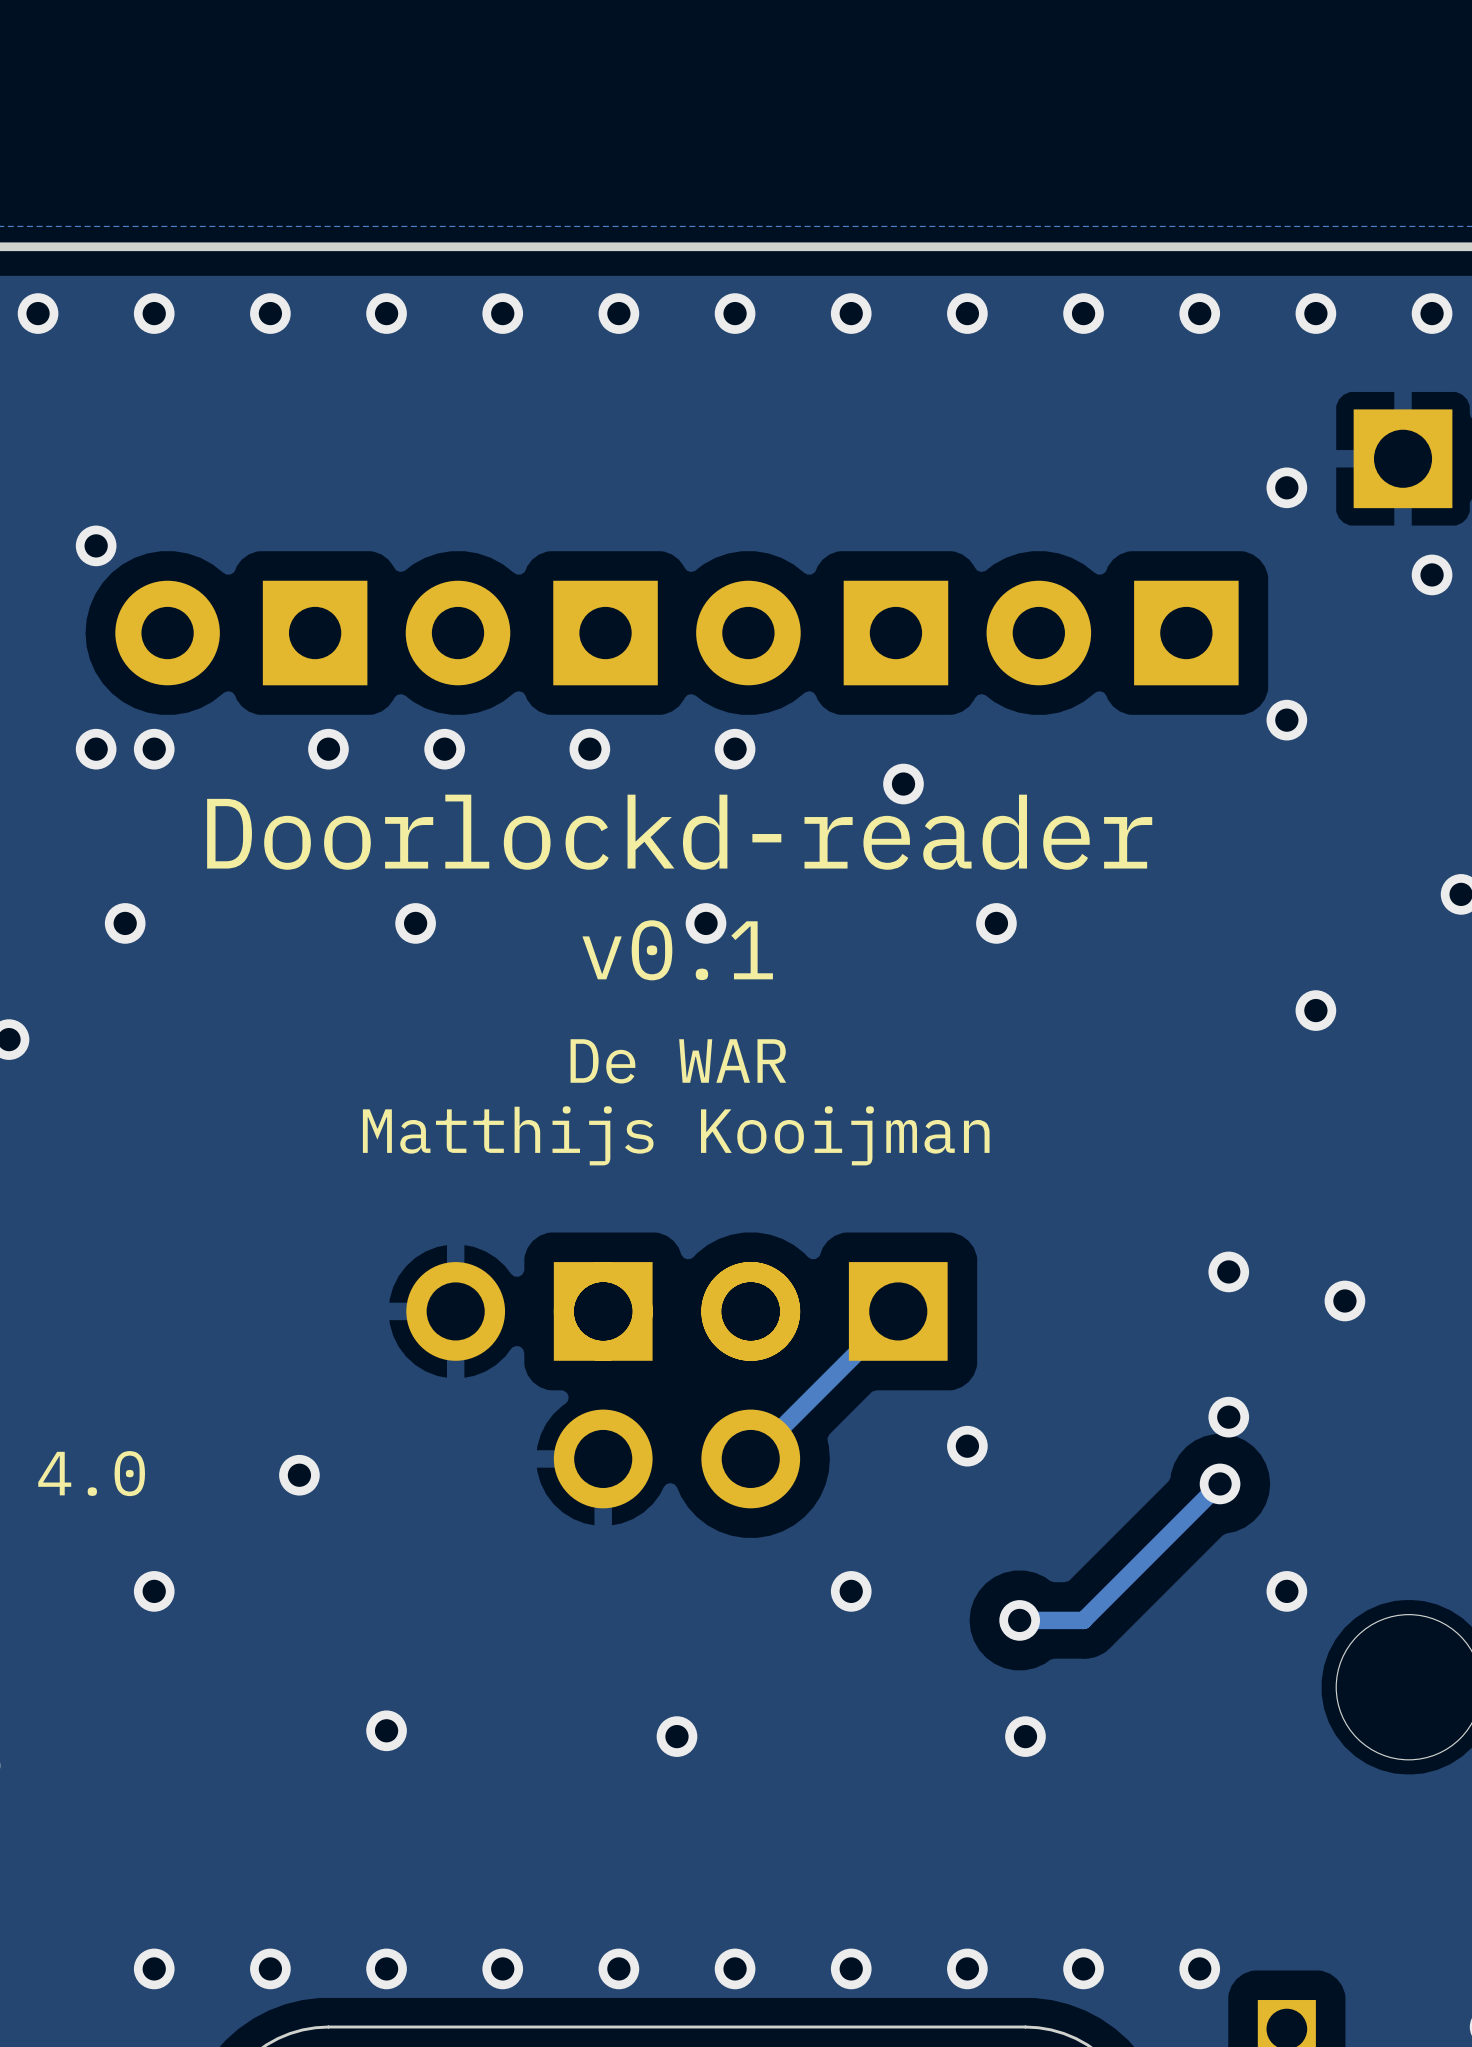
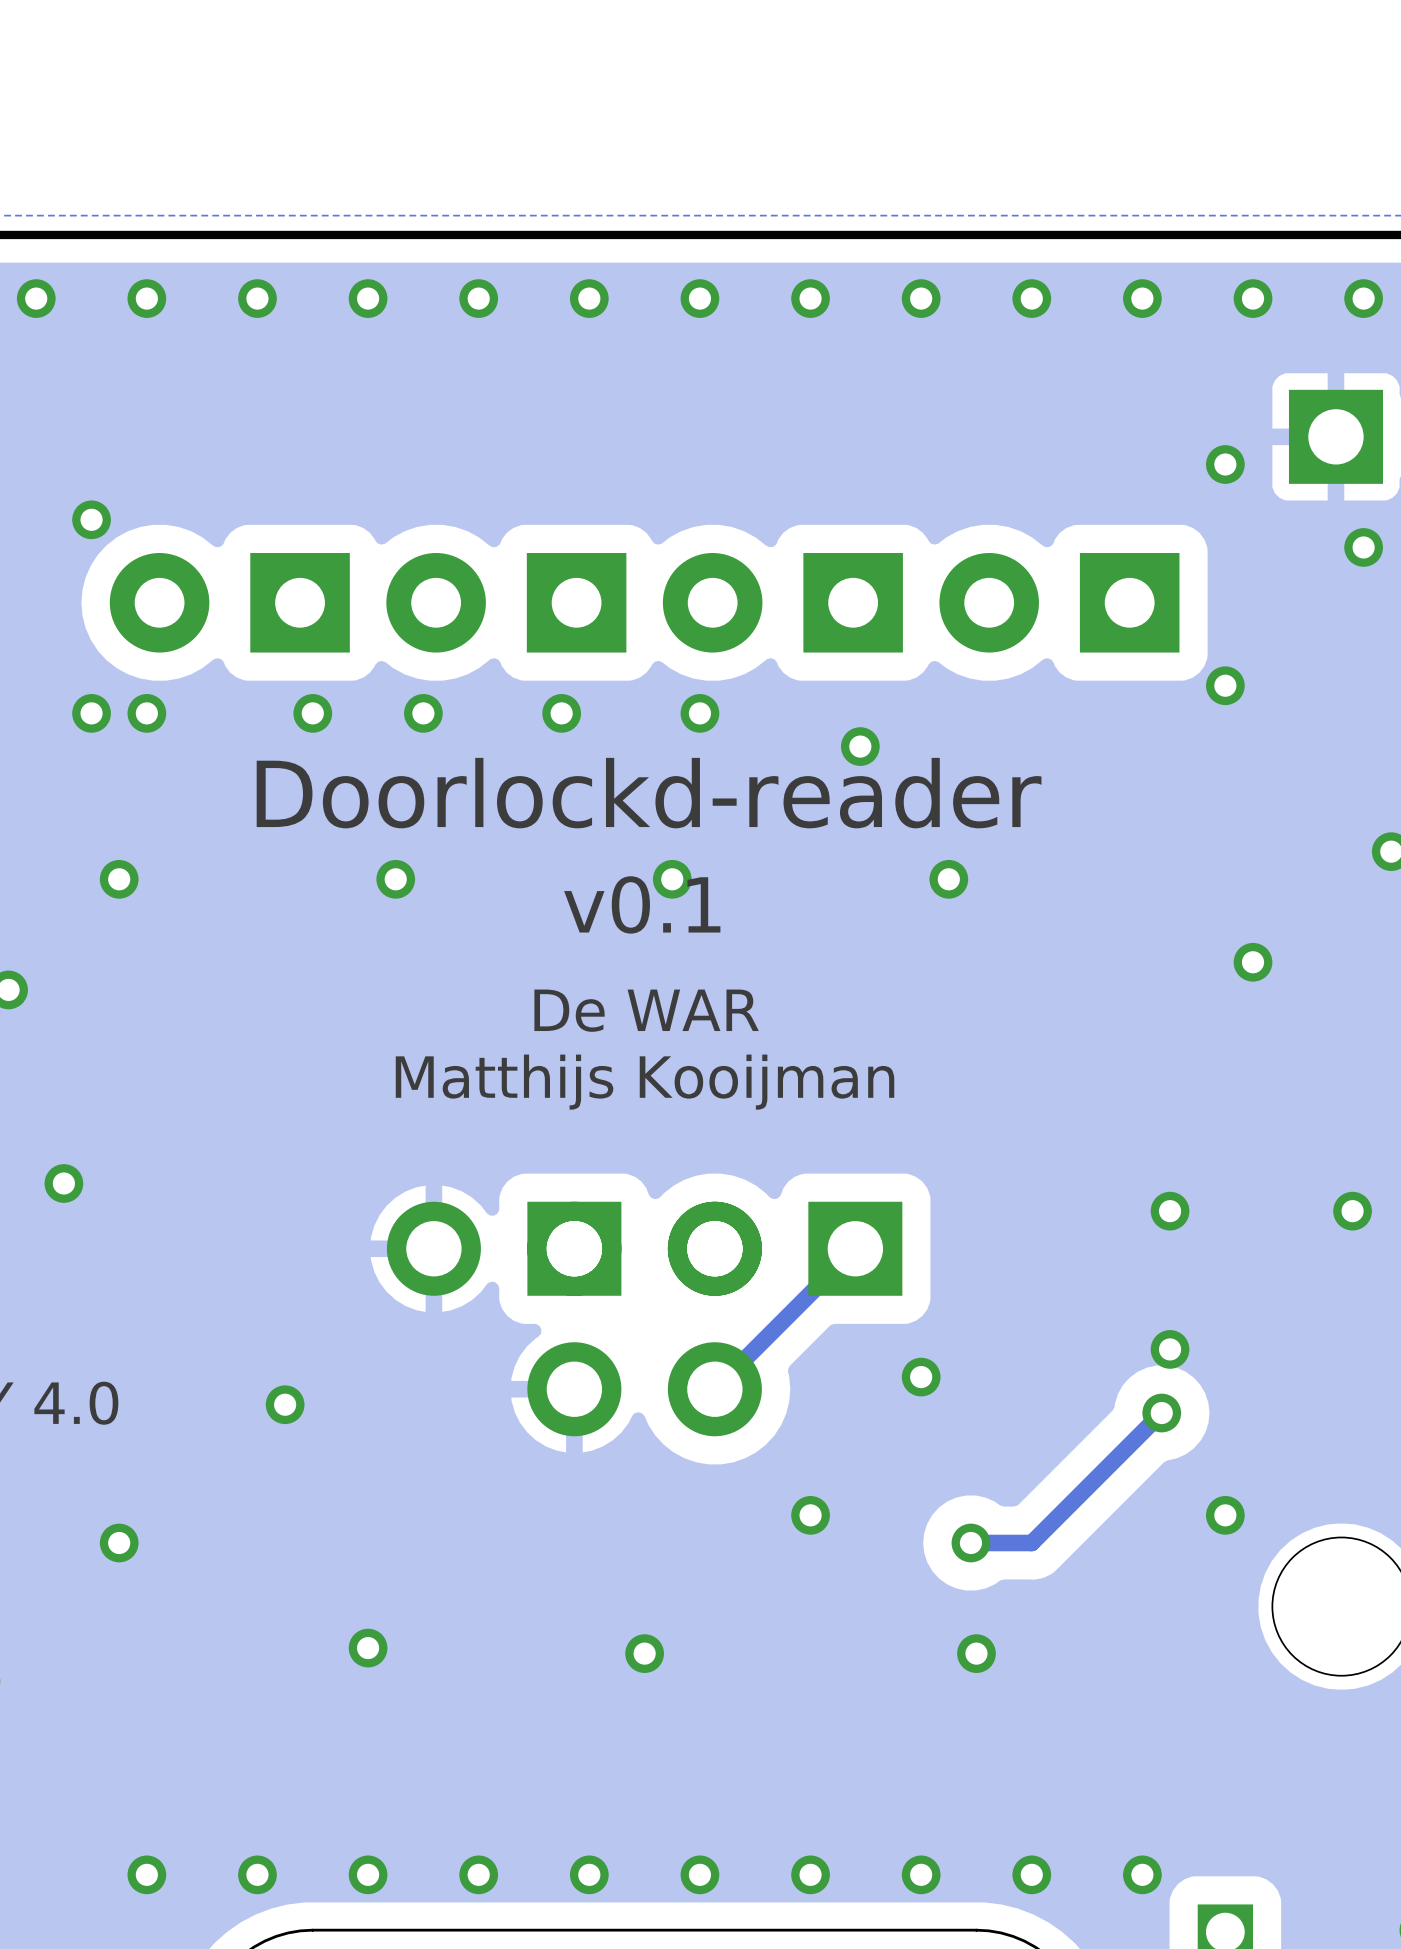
via: none -> (63, 1183)
via position: (1344, 1300) -> (1352, 1211)
via position: (154, 1591) -> (119, 1543)

